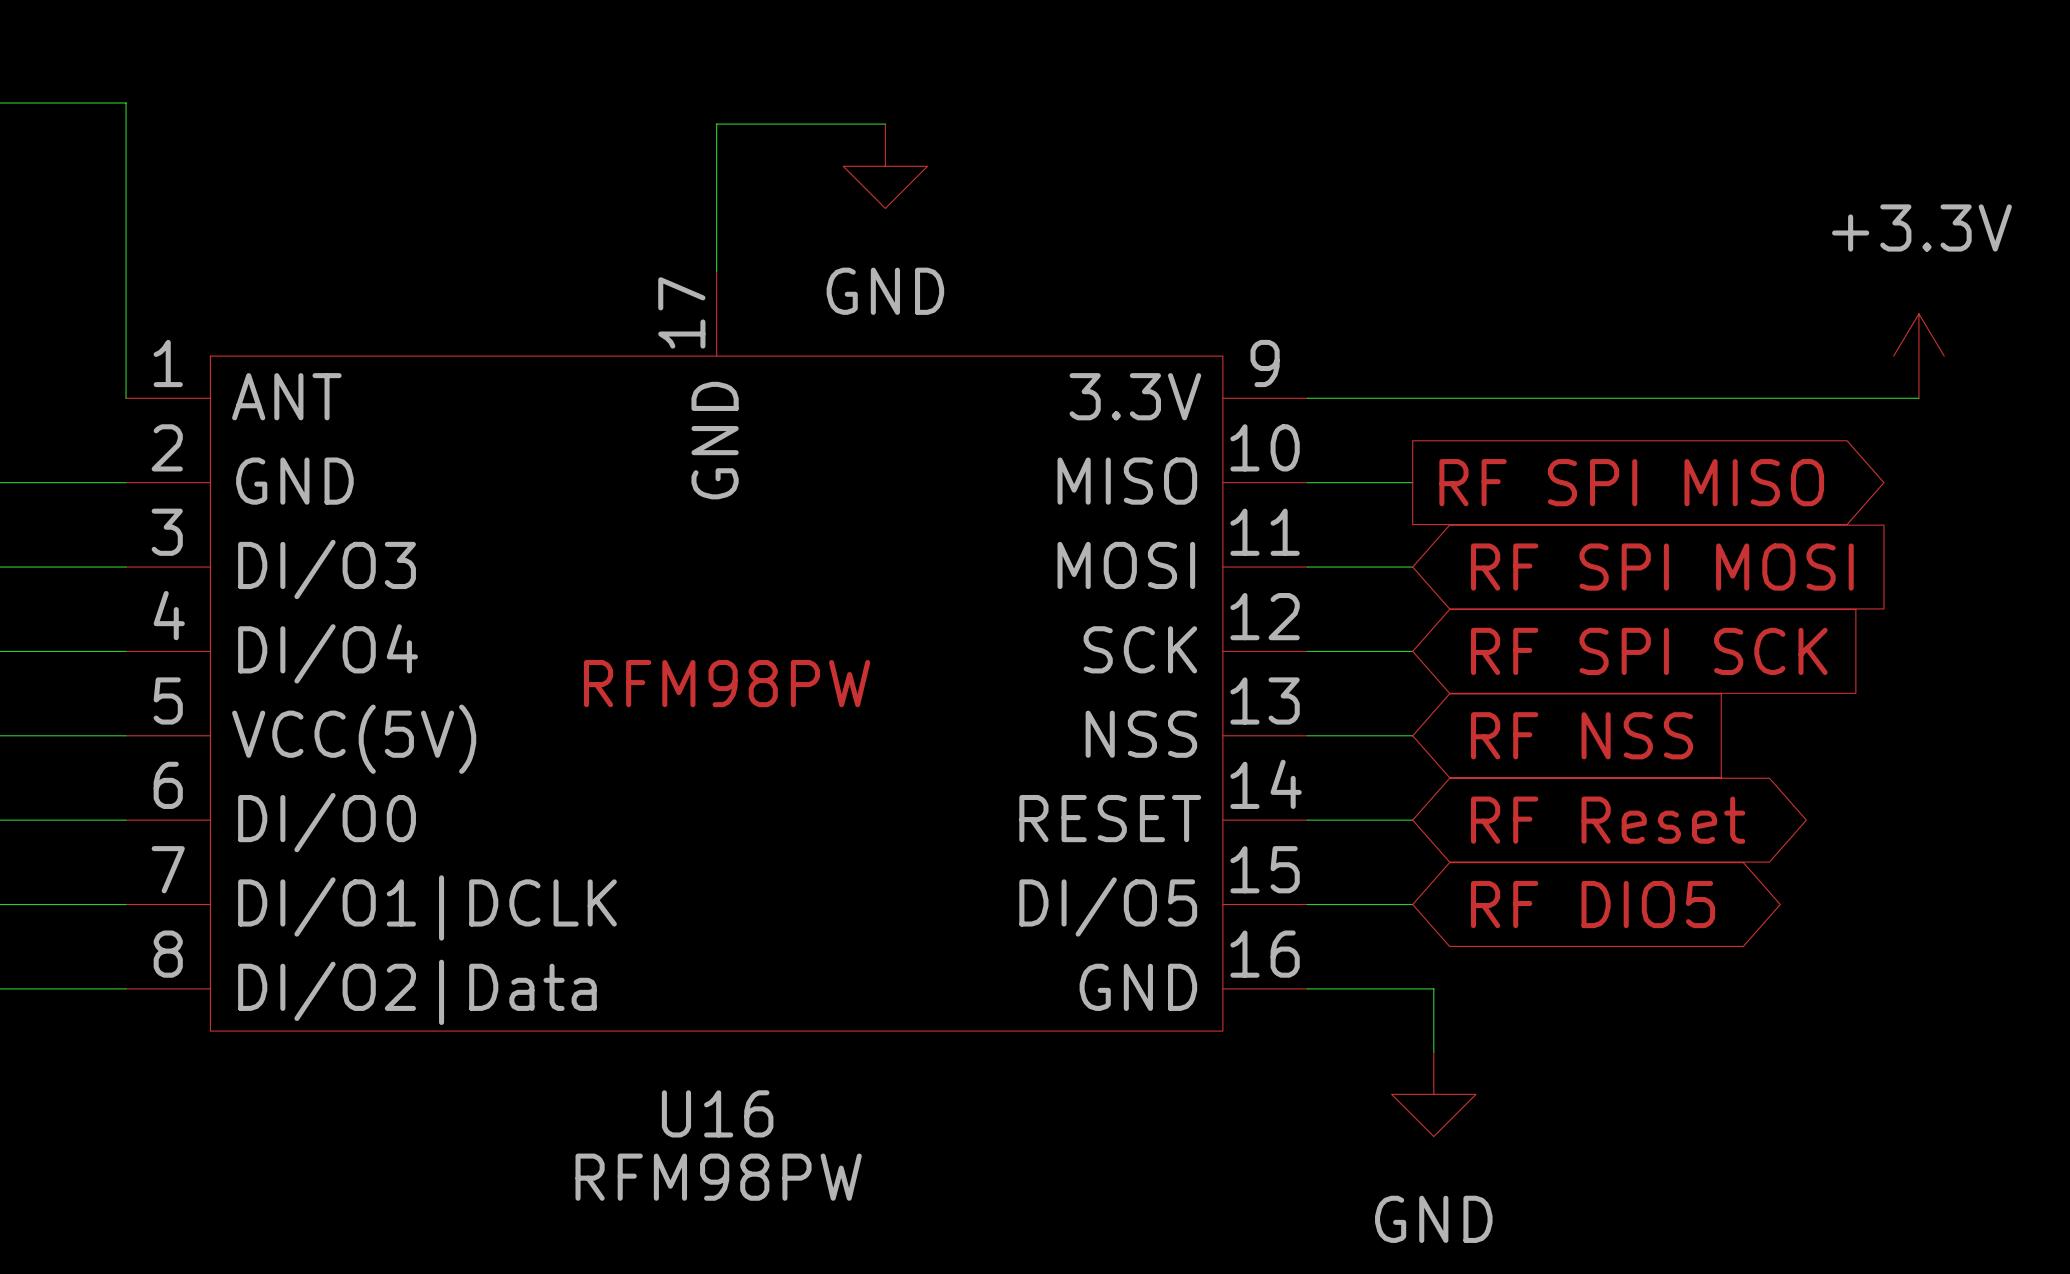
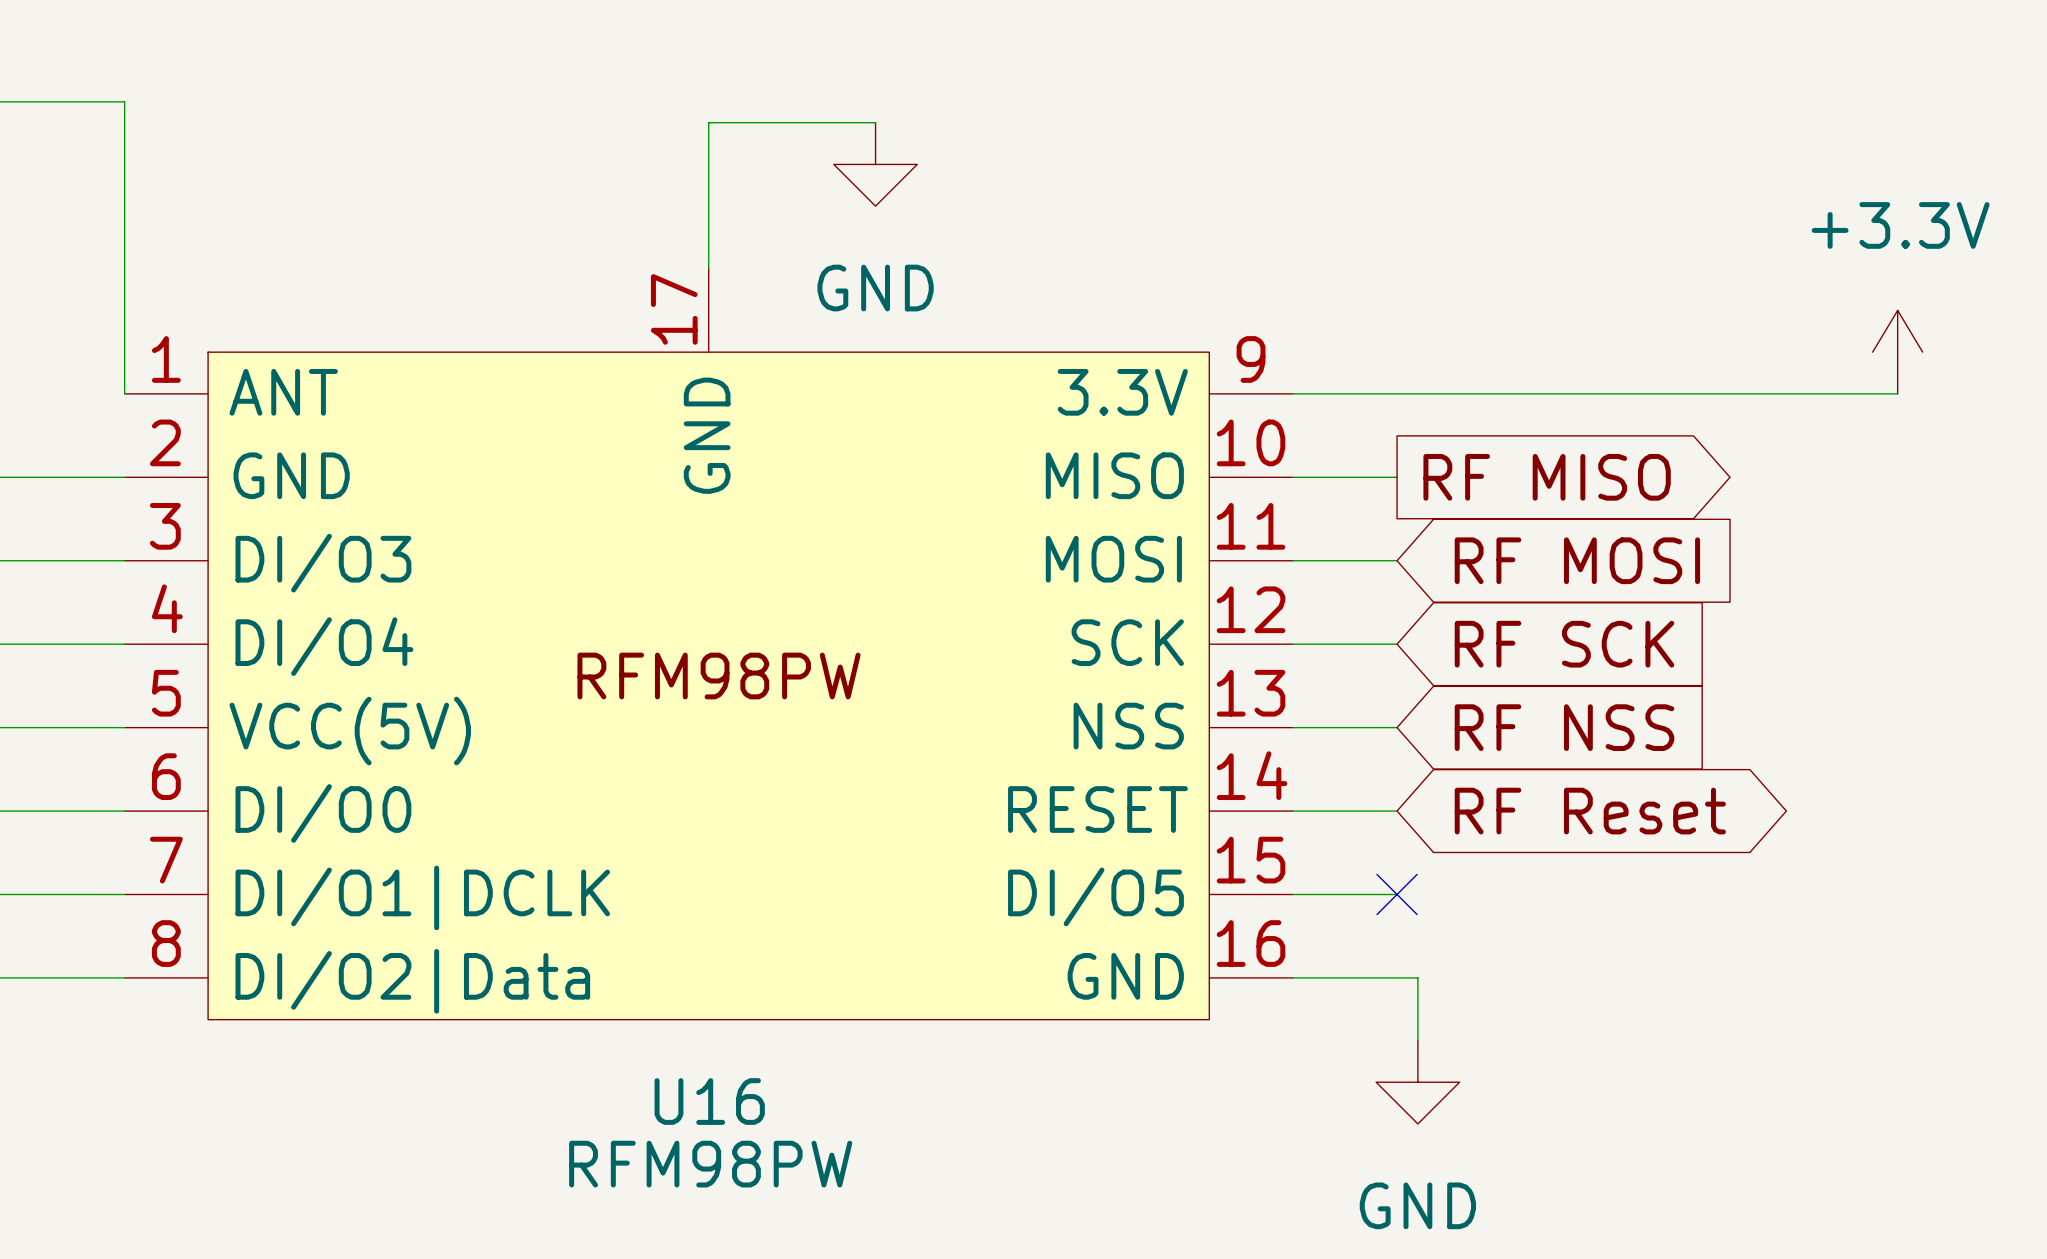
global label: RF SPI MISO (1631, 482) -> RF MISO (1547, 477)
global label: RF SPI MOSI (1662, 567) -> RF MOSI (1577, 560)
global label: RF SPI SCK (1649, 651) -> RF SCK (1564, 644)
no-connect mark: none -> (1397, 894)
global label: RF DIO5 (1593, 904) -> none

